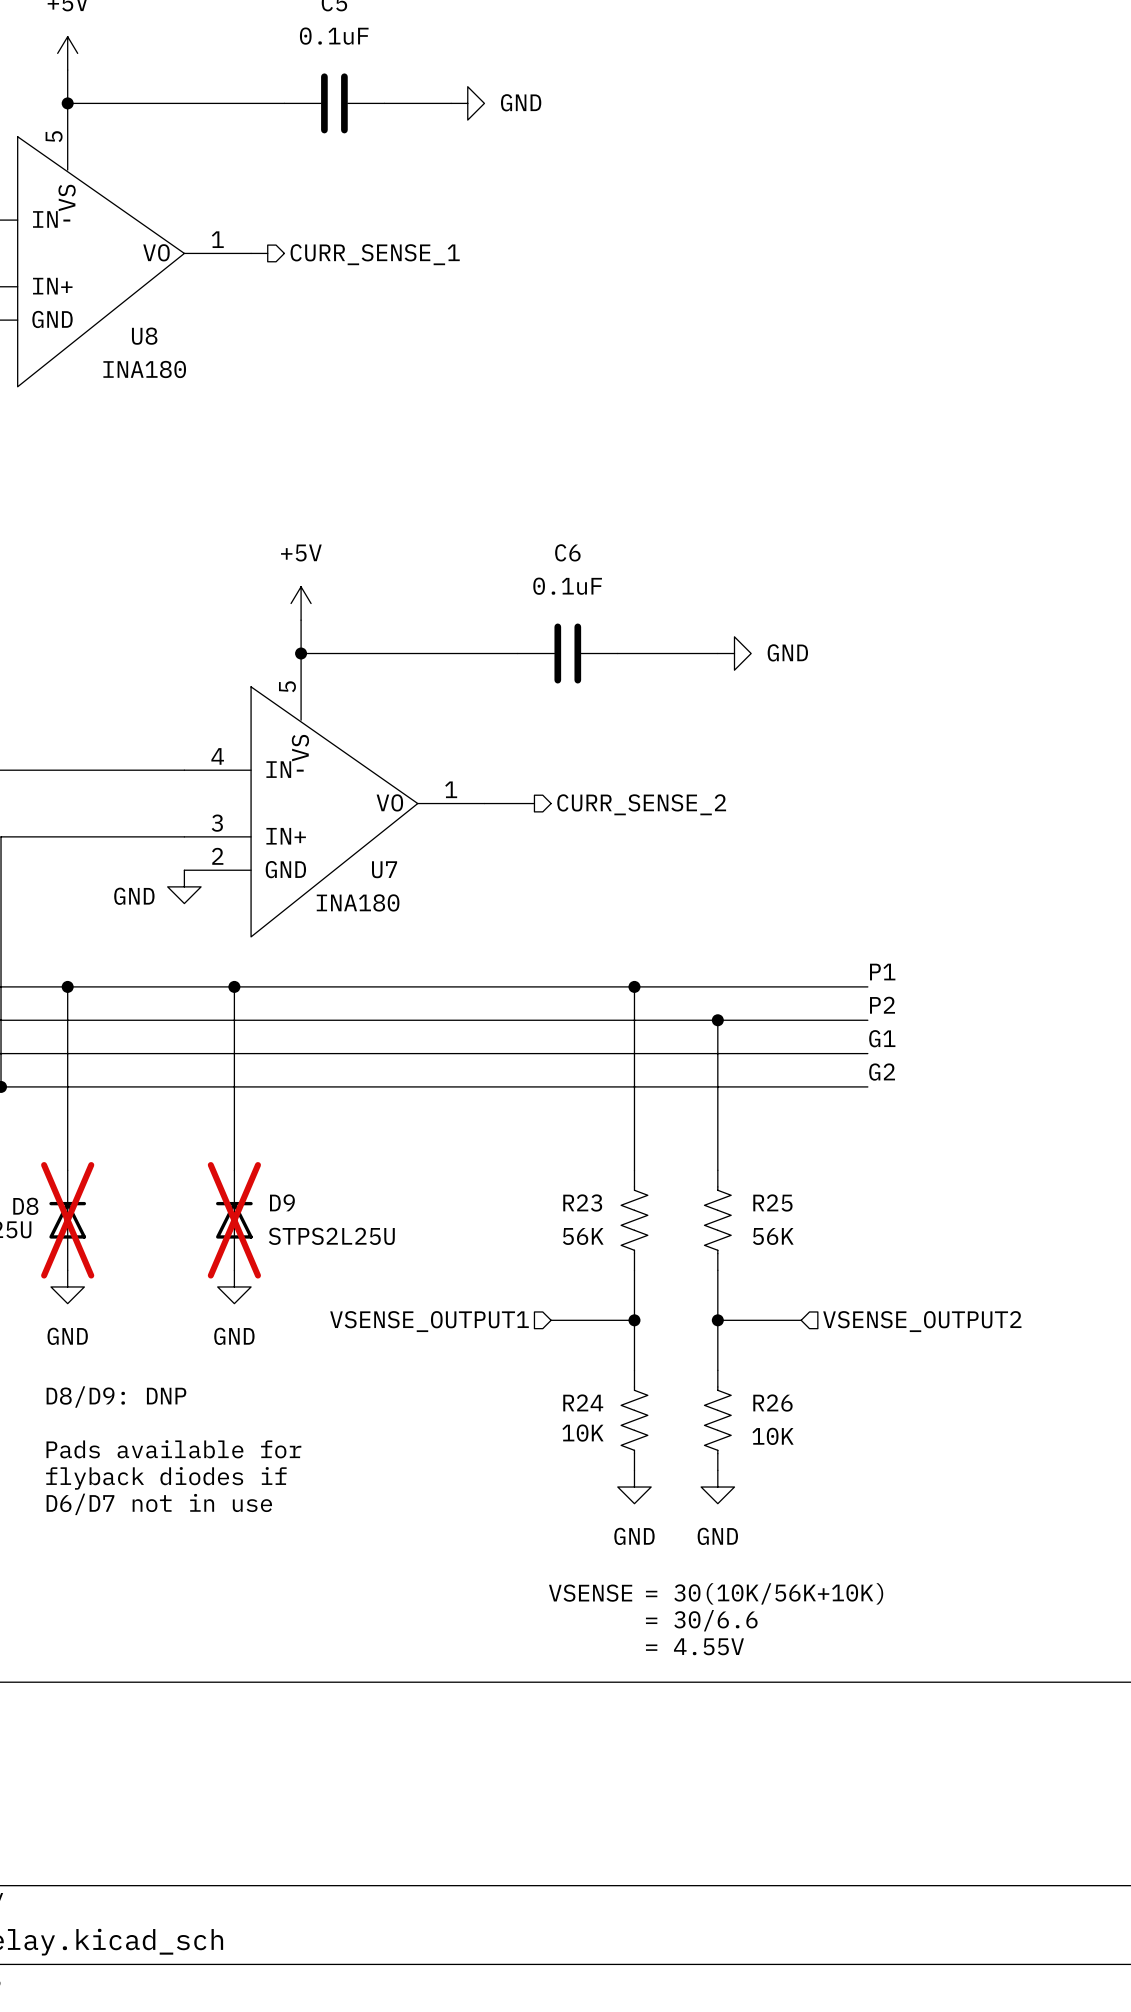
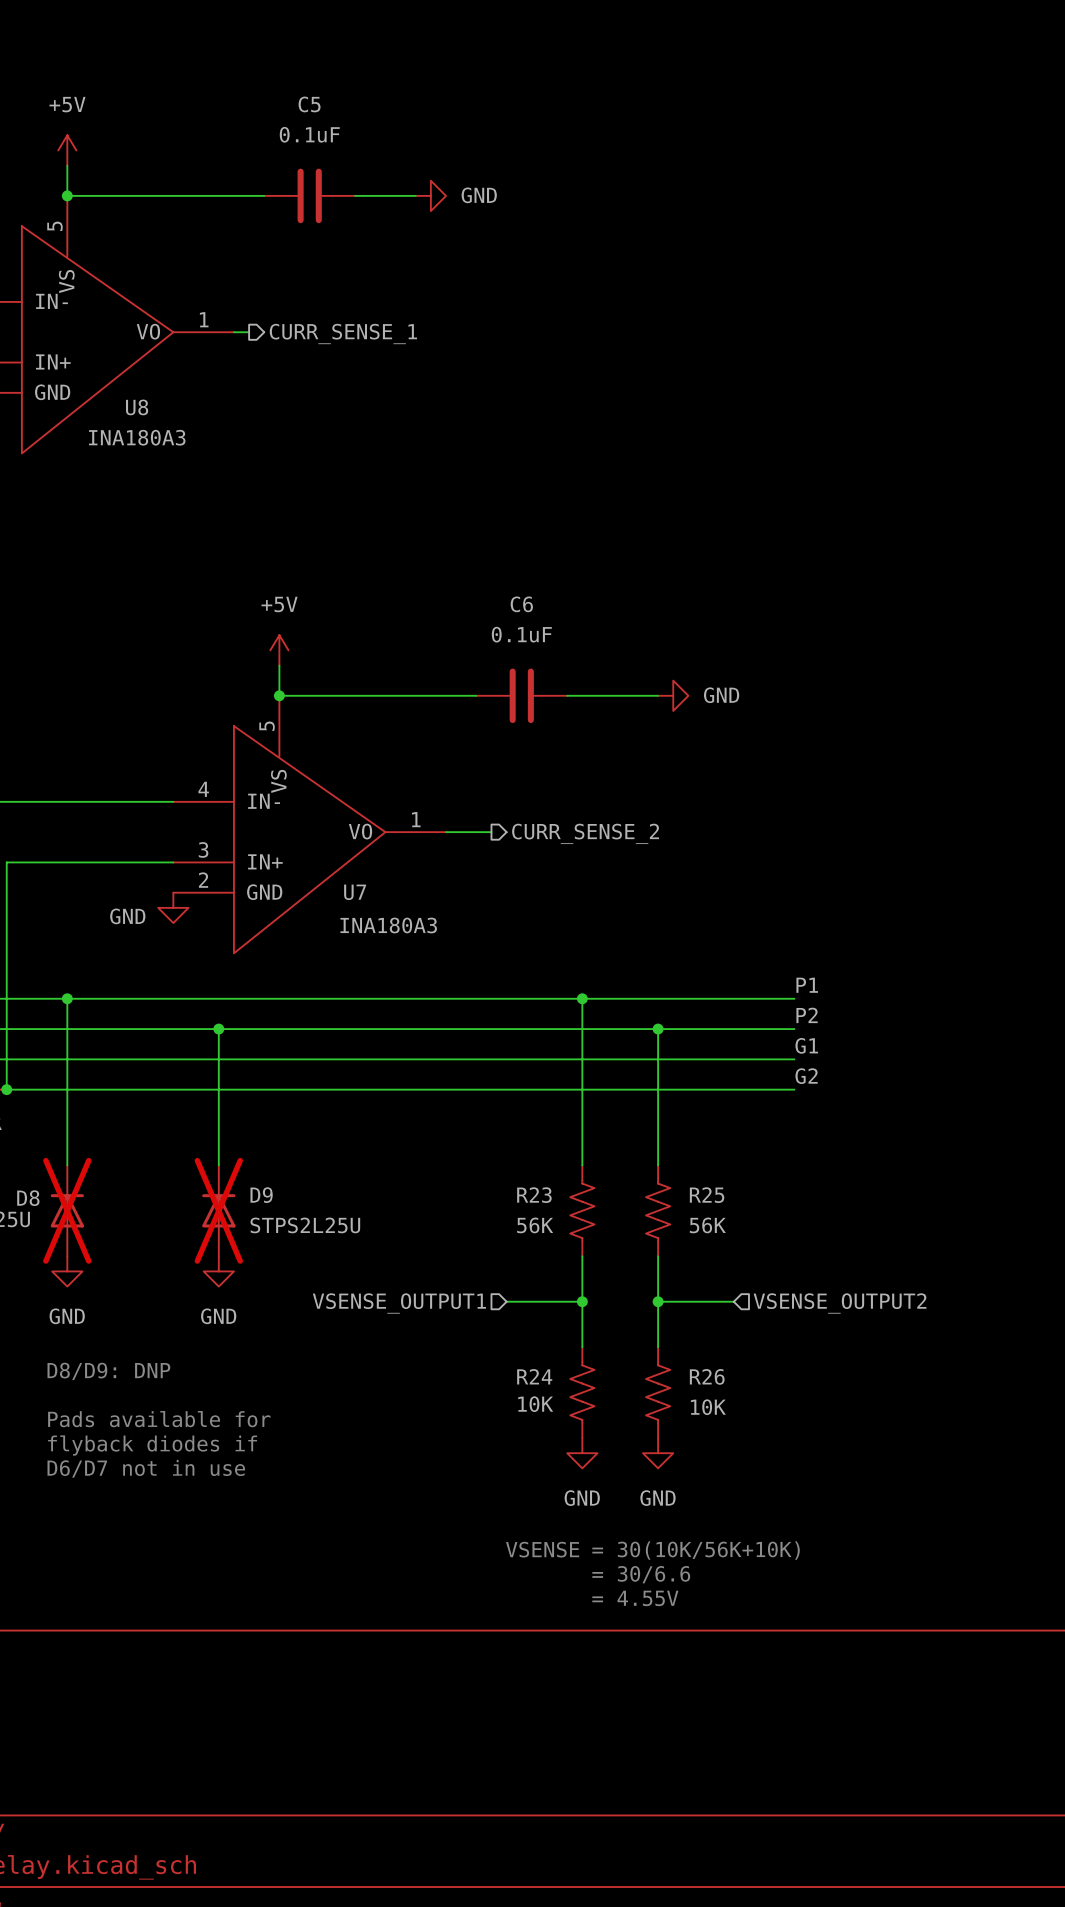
U8 value: INA180 (144, 369) -> INA180A3 (137, 437)
U7 value: INA180 (358, 902) -> INA180A3 (388, 925)
wire: (234, 986) (234, 1020) -> none
junction position: (234, 986) -> (218, 1029)

